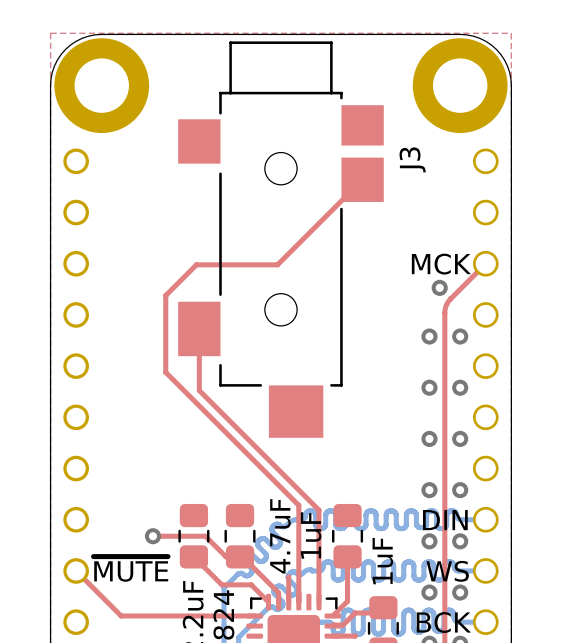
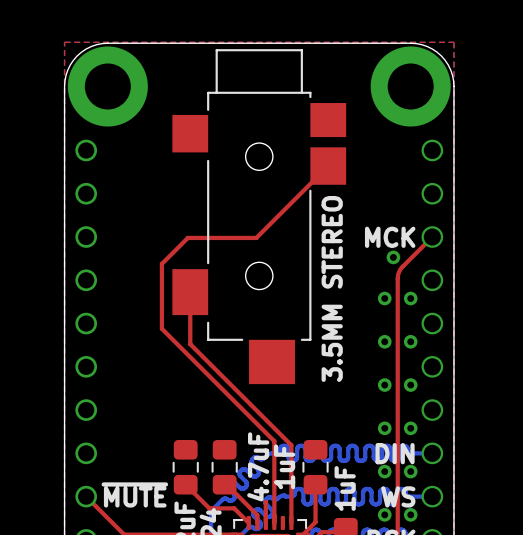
J3 name: J3 (412, 159) -> 3.5MM STEREO (332, 288)
top track: (152, 536) (205, 536) (226, 556) (240, 556) -> none
via: (152, 536) -> none

